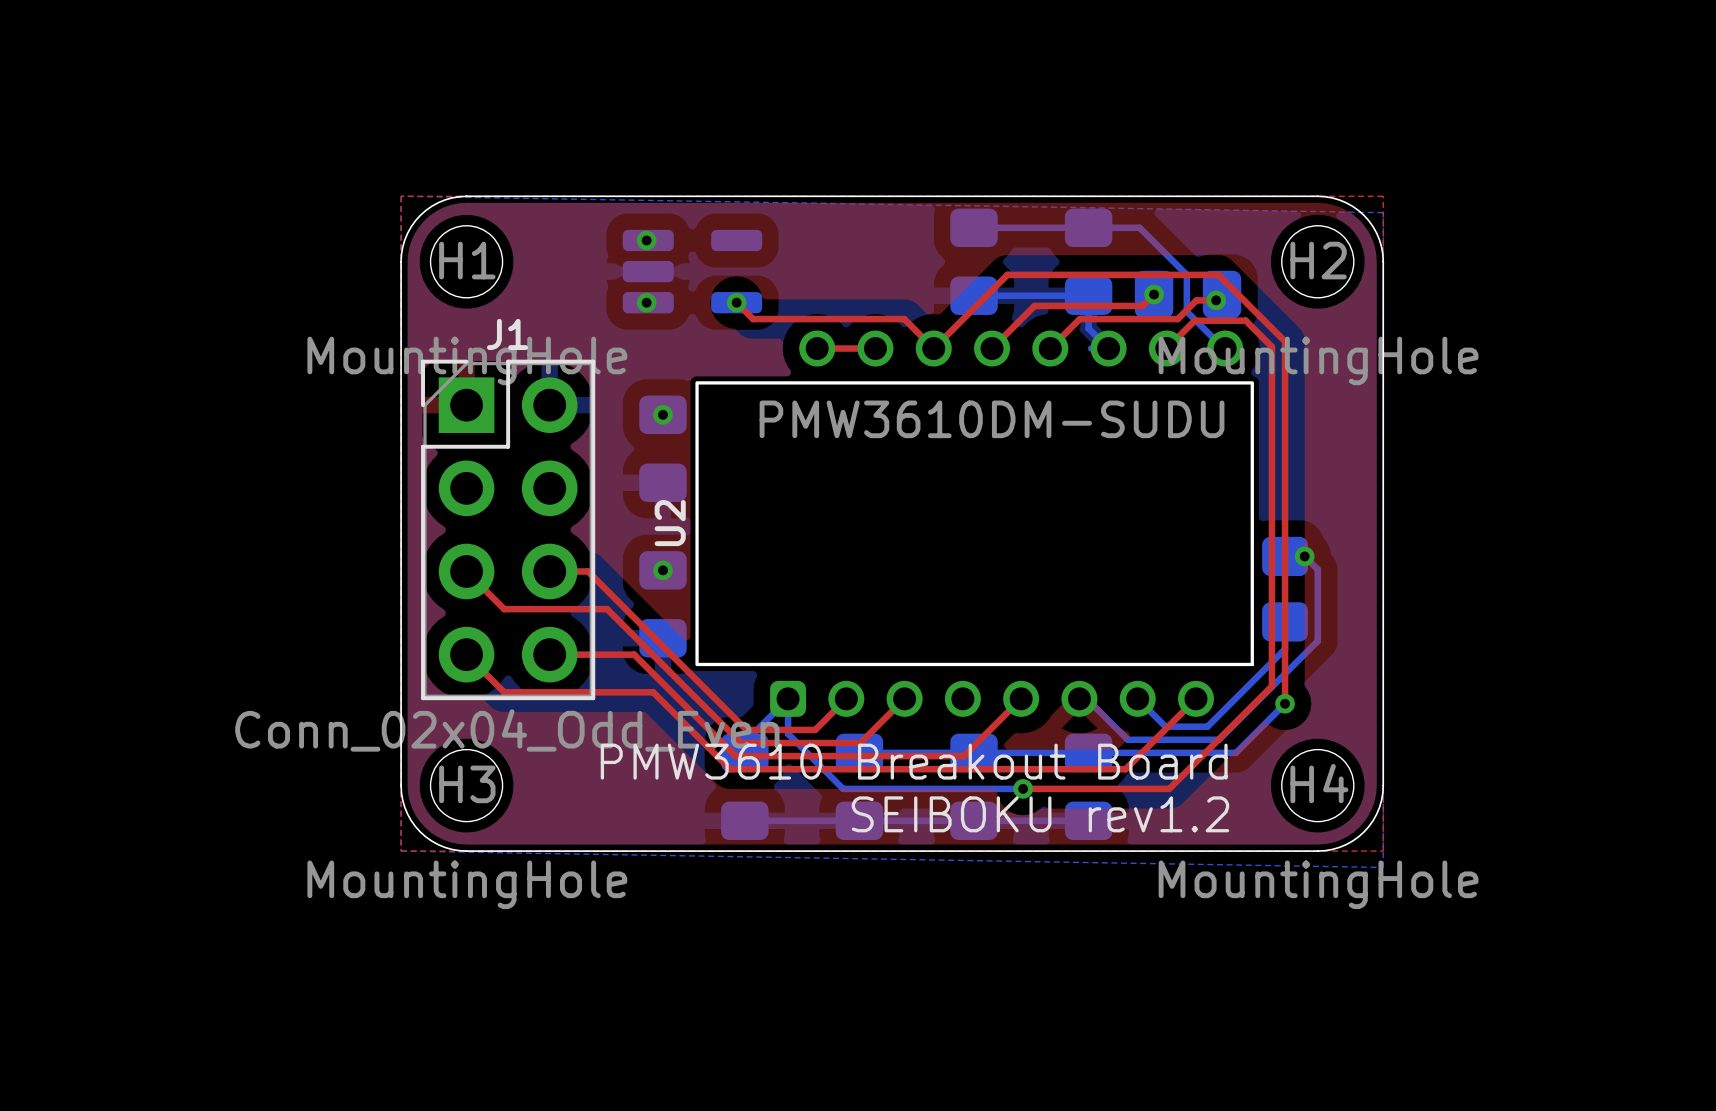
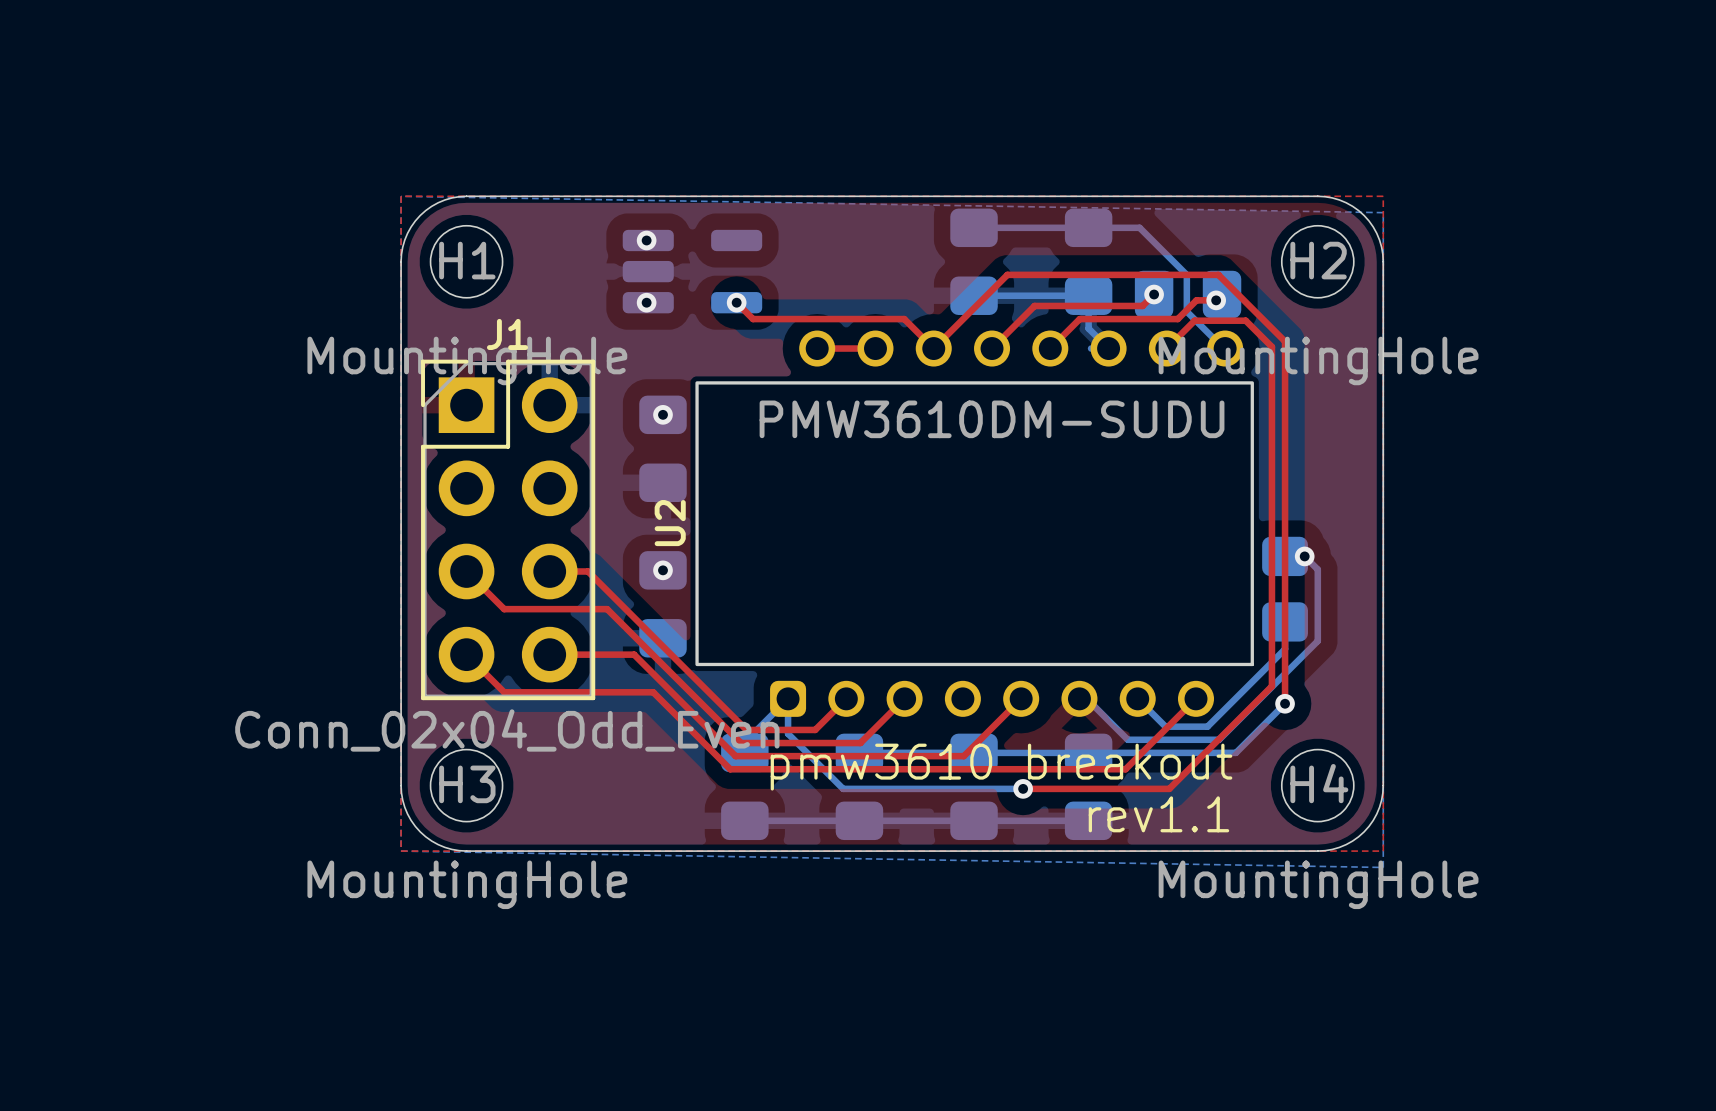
text: PMW3610 Breakout Board (914, 761) -> pmw3610 breakout (1001, 767)
text: SEIBOKU rev1.2 (1040, 814) -> rev1.1 (1158, 814)

